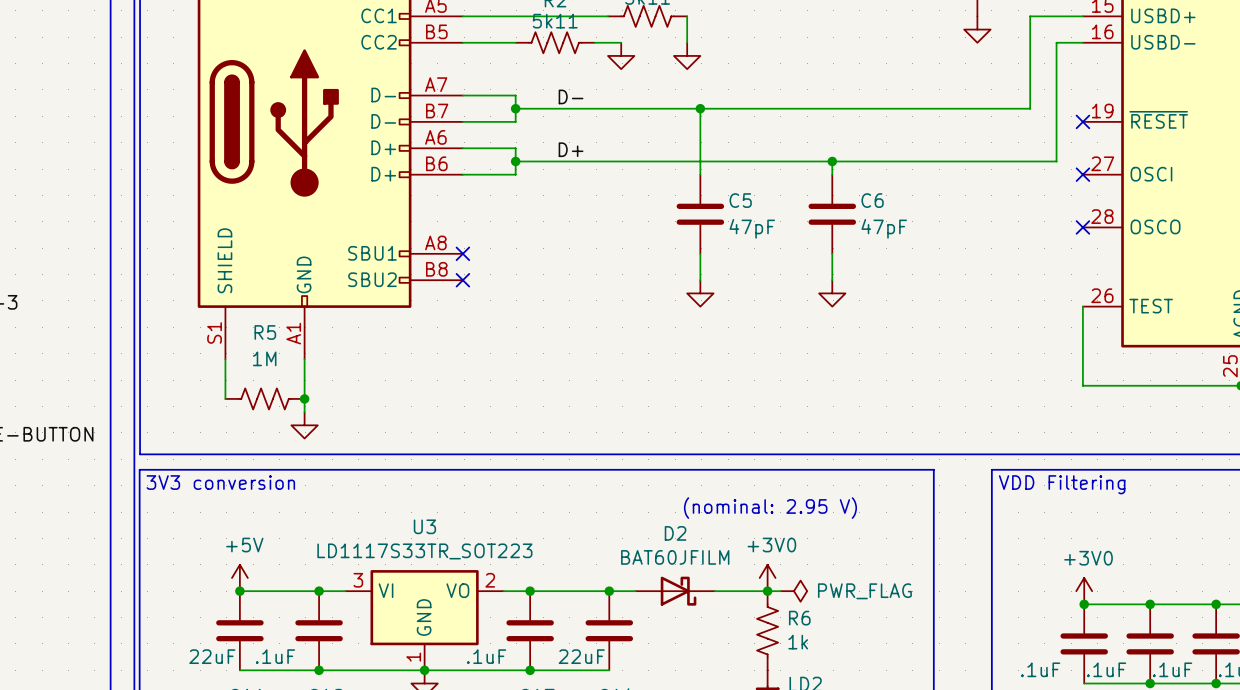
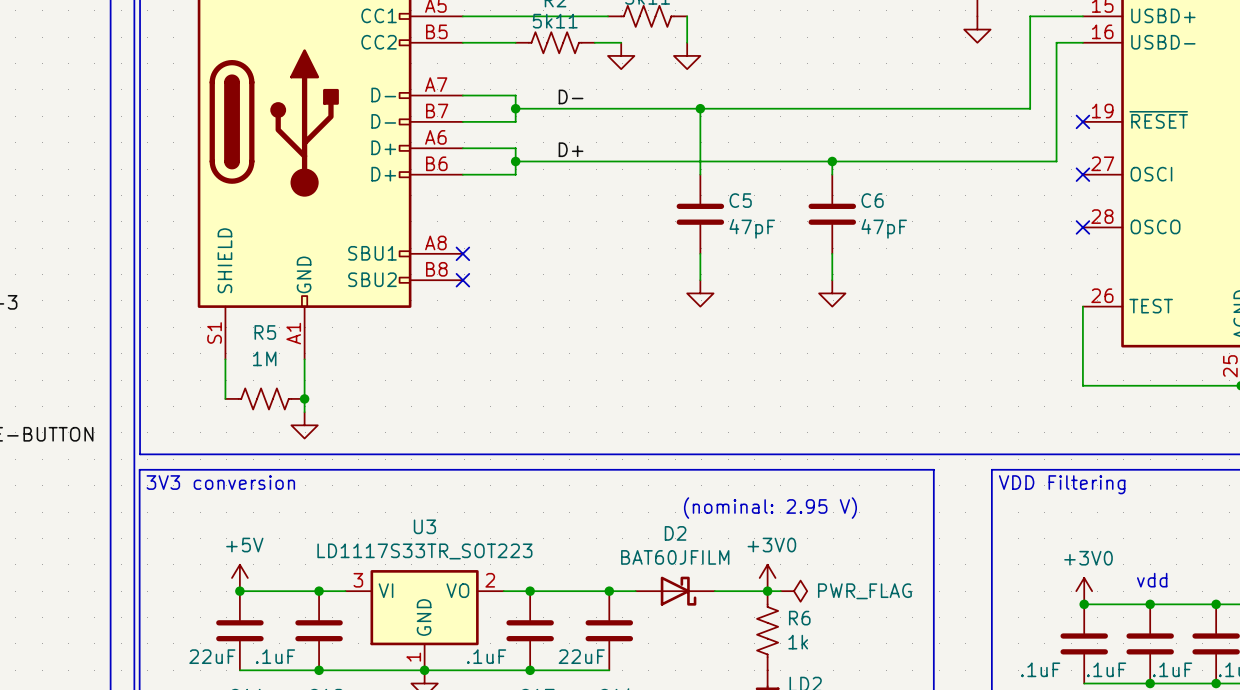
text: none -> vdd (1152, 580)

